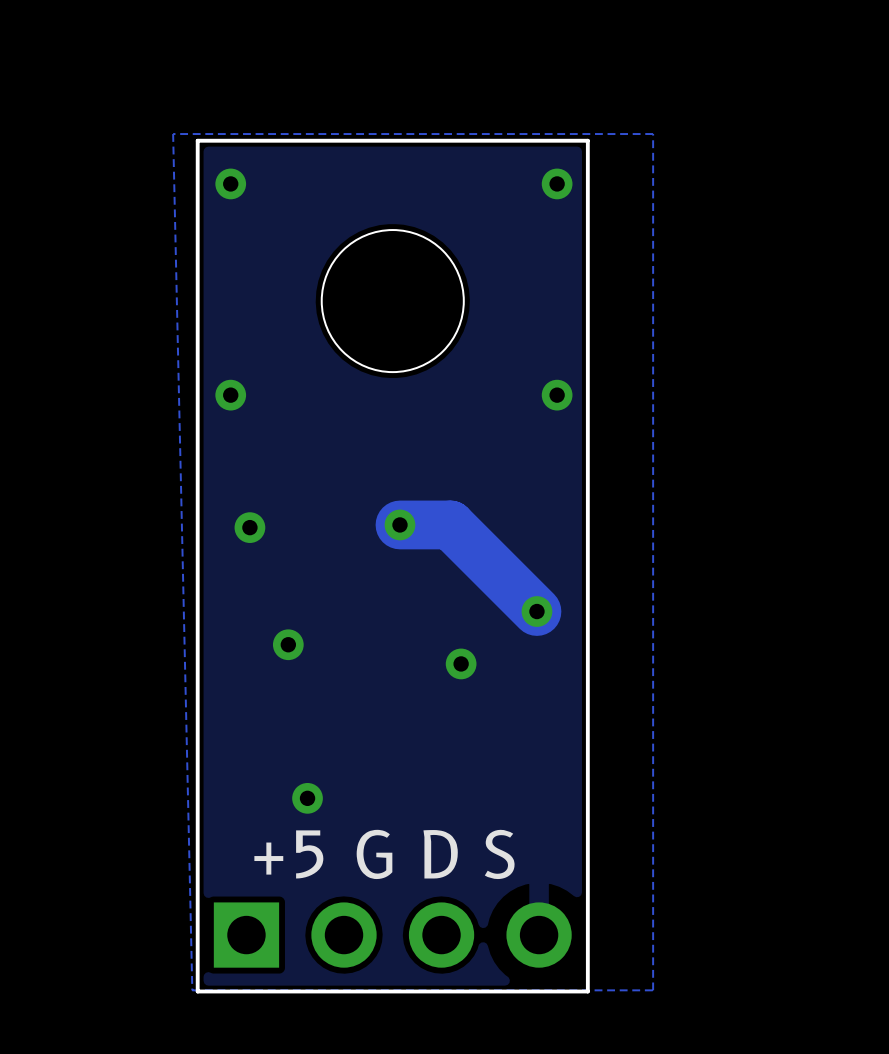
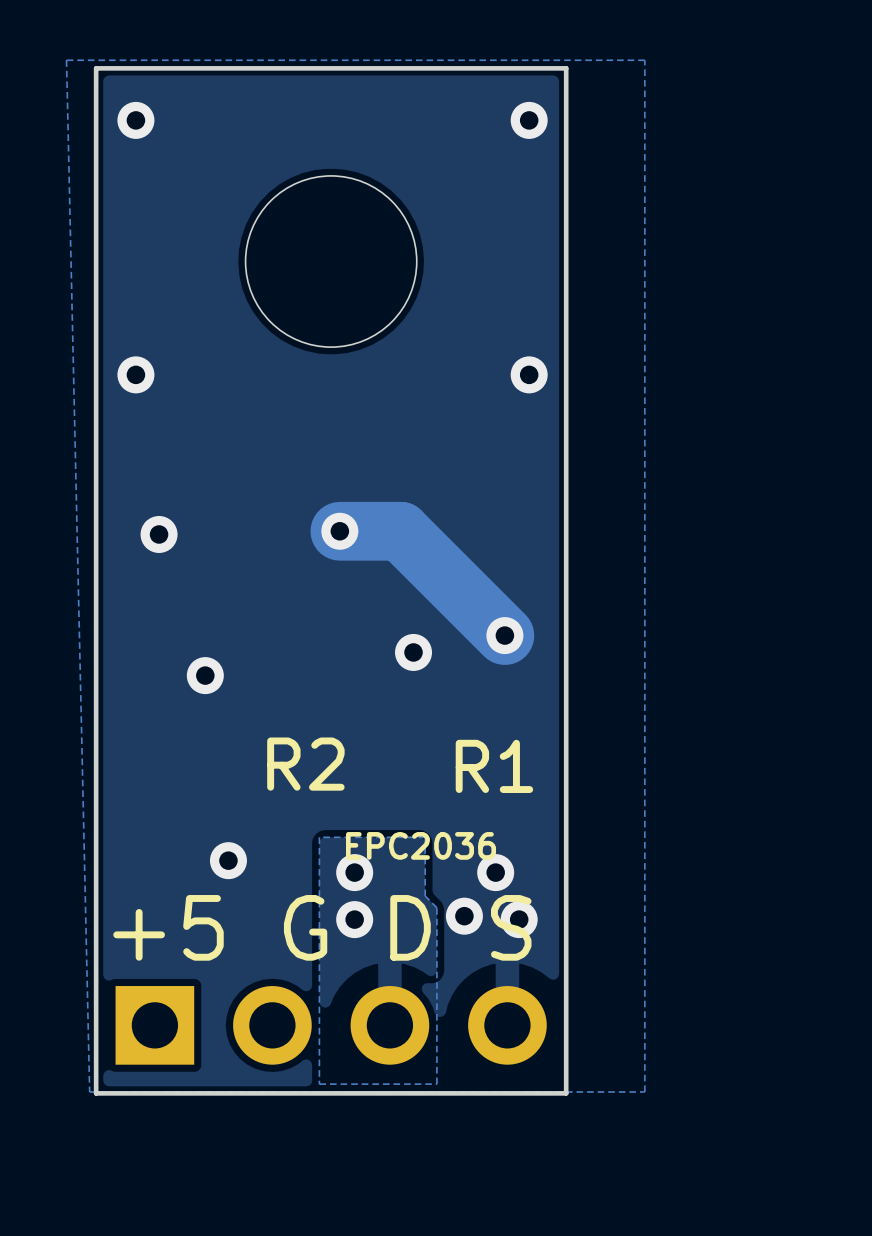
via position: (461, 663) -> (413, 652)
R2: none -> (305, 764)
R1: none -> (494, 766)
zone outline: none -> (425, 837) (425, 896) (436, 907) (436, 1084) (319, 1084) (319, 837) (425, 837)
part: none -> EPC2036 (421, 845)
via: none -> (354, 872)
via: none -> (495, 872)
via: none -> (464, 916)
via: none -> (354, 919)
via: none -> (519, 919)

